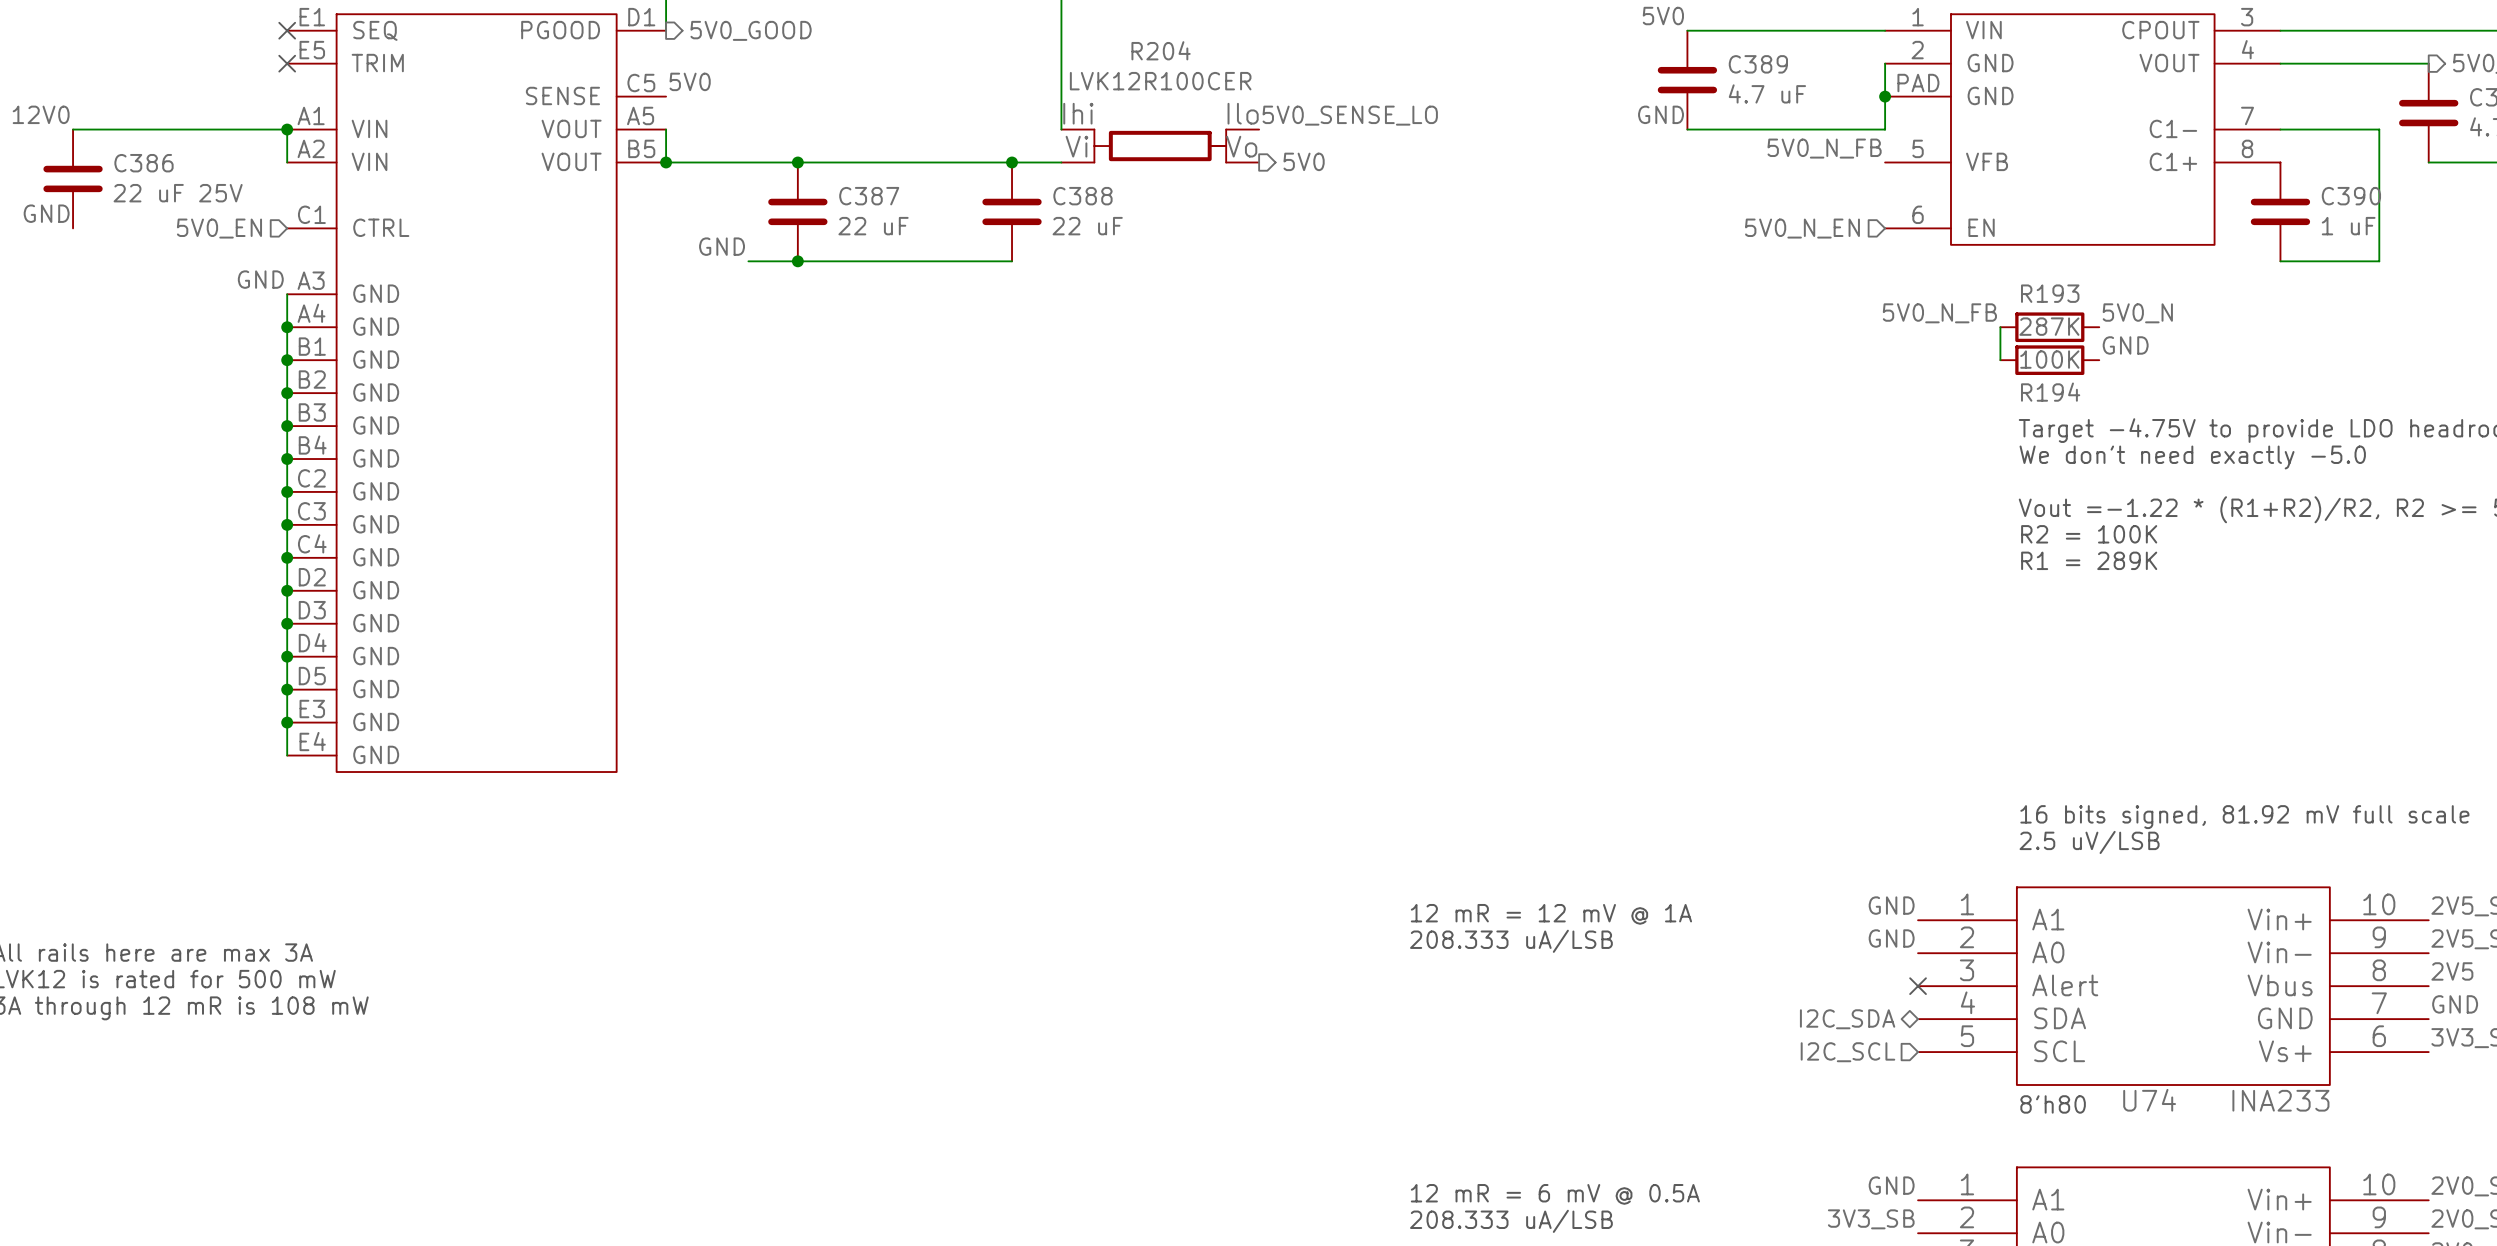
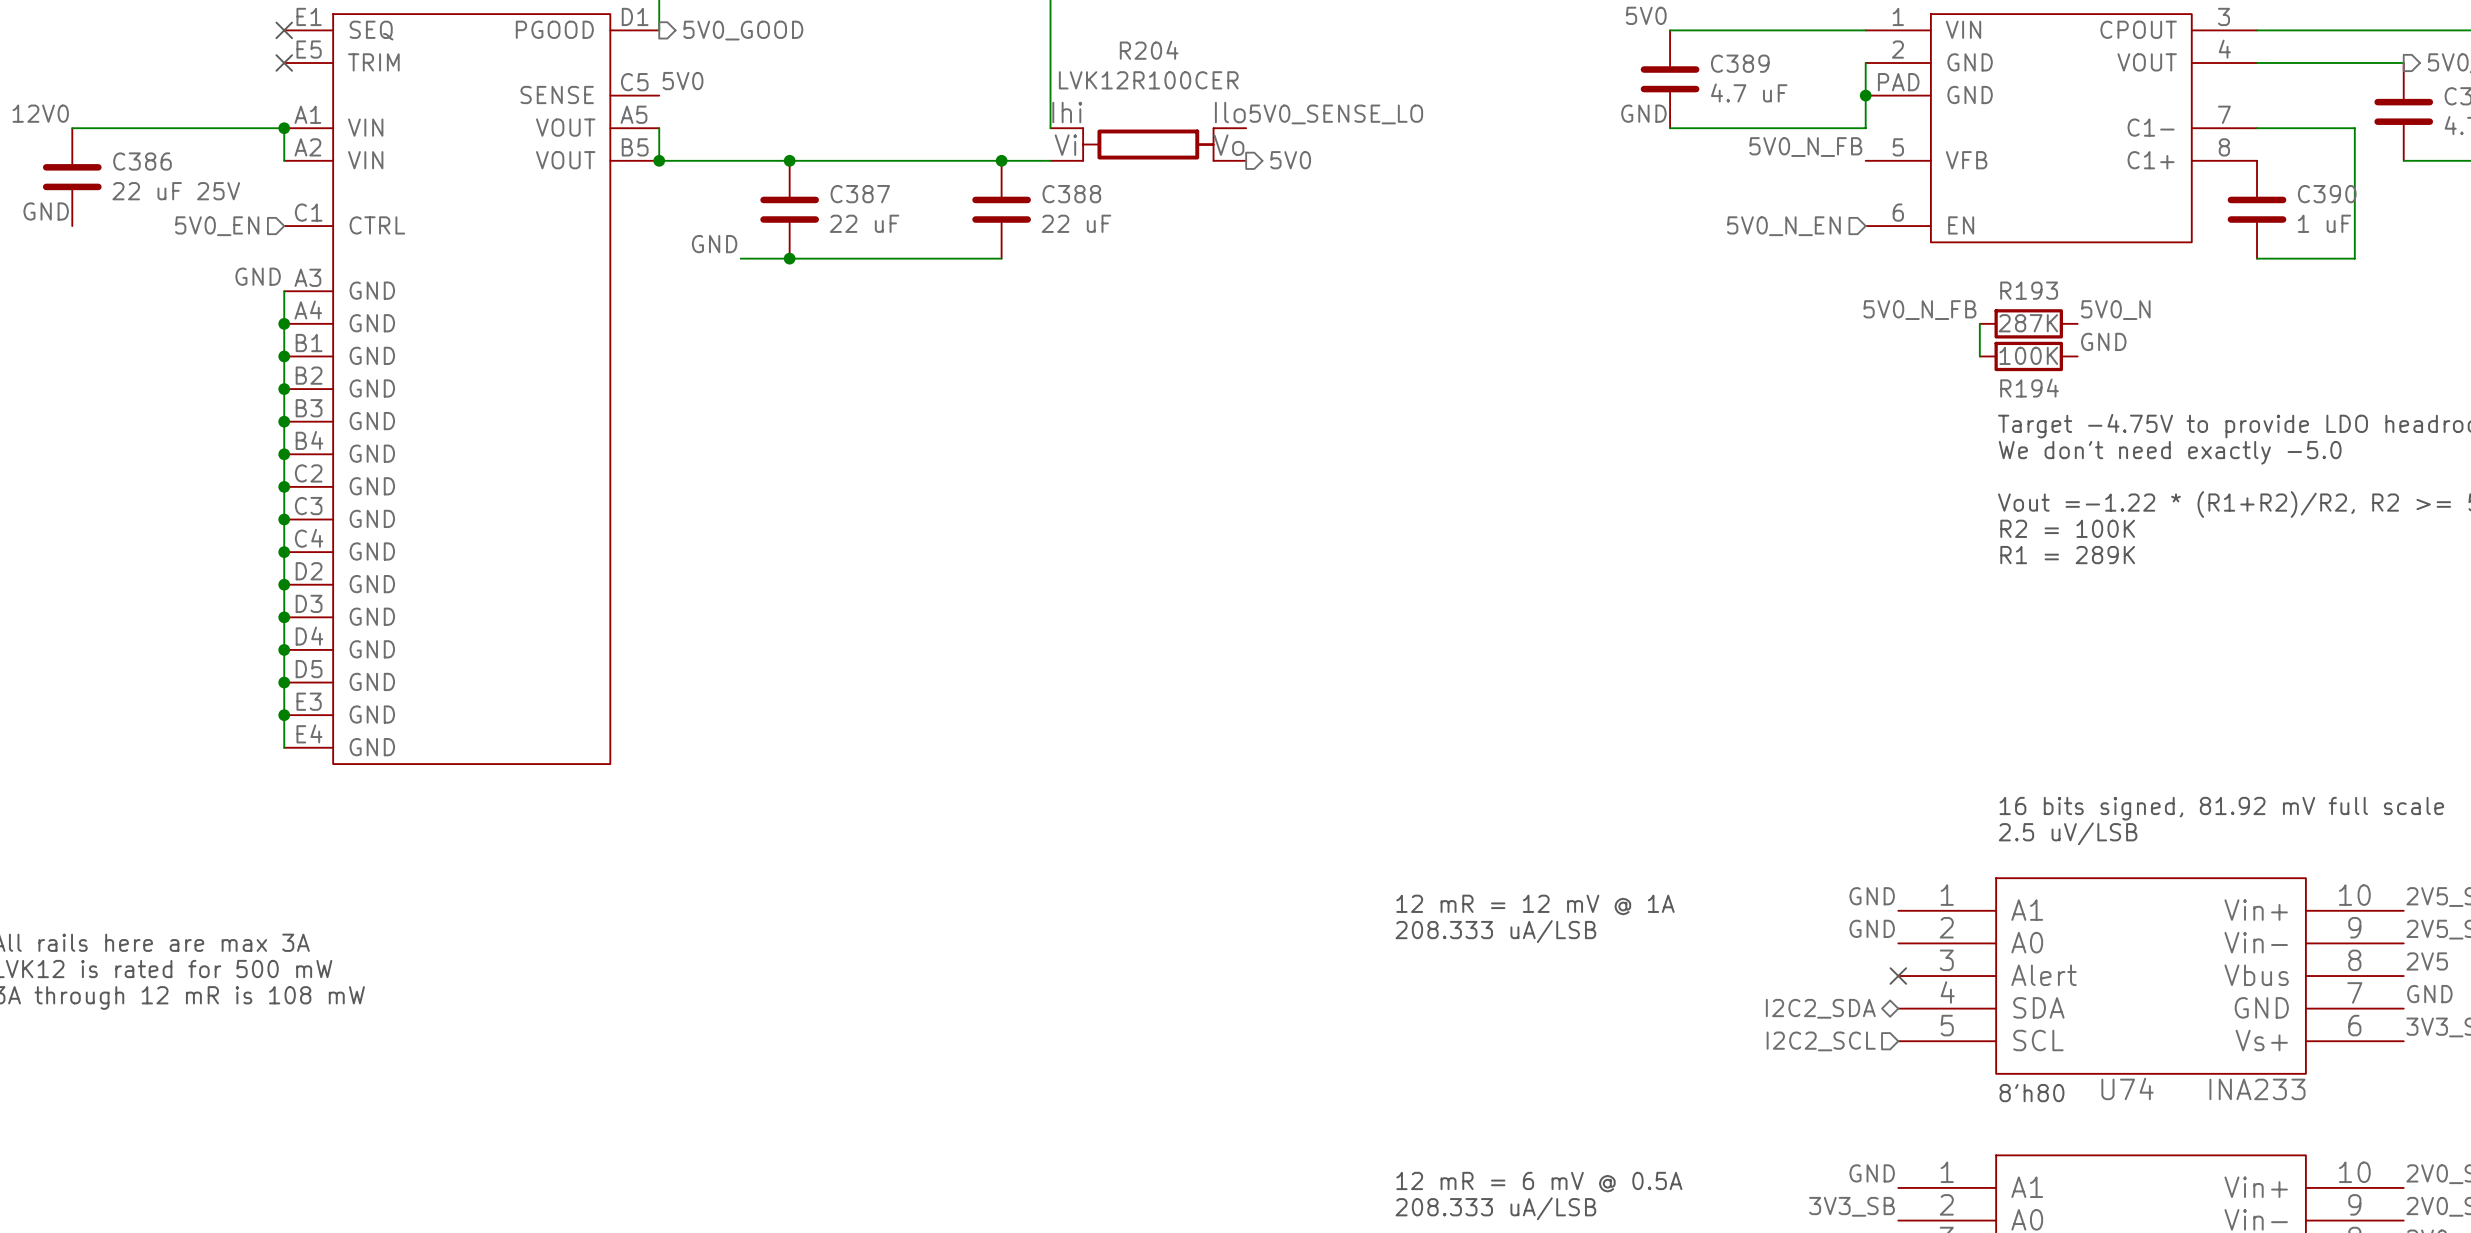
hierarchical label: I2C_SDA (1847, 1019) -> I2C2_SDA (1820, 1008)
hierarchical label: I2C_SCL (1847, 1052) -> I2C2_SCL (1821, 1041)

